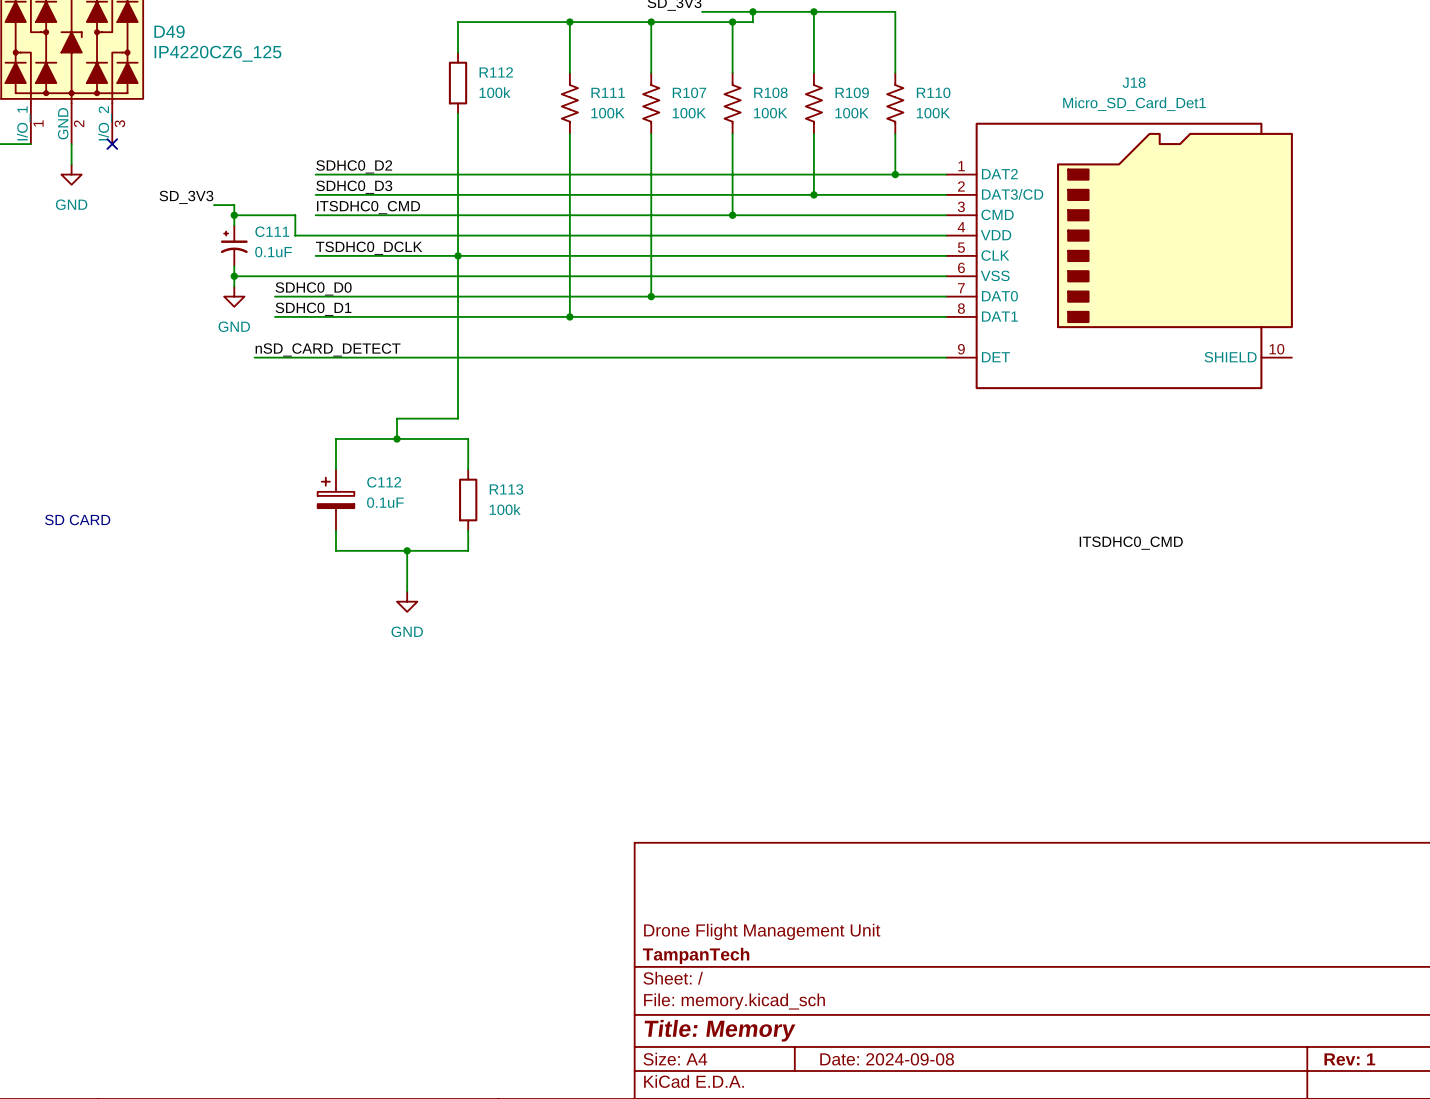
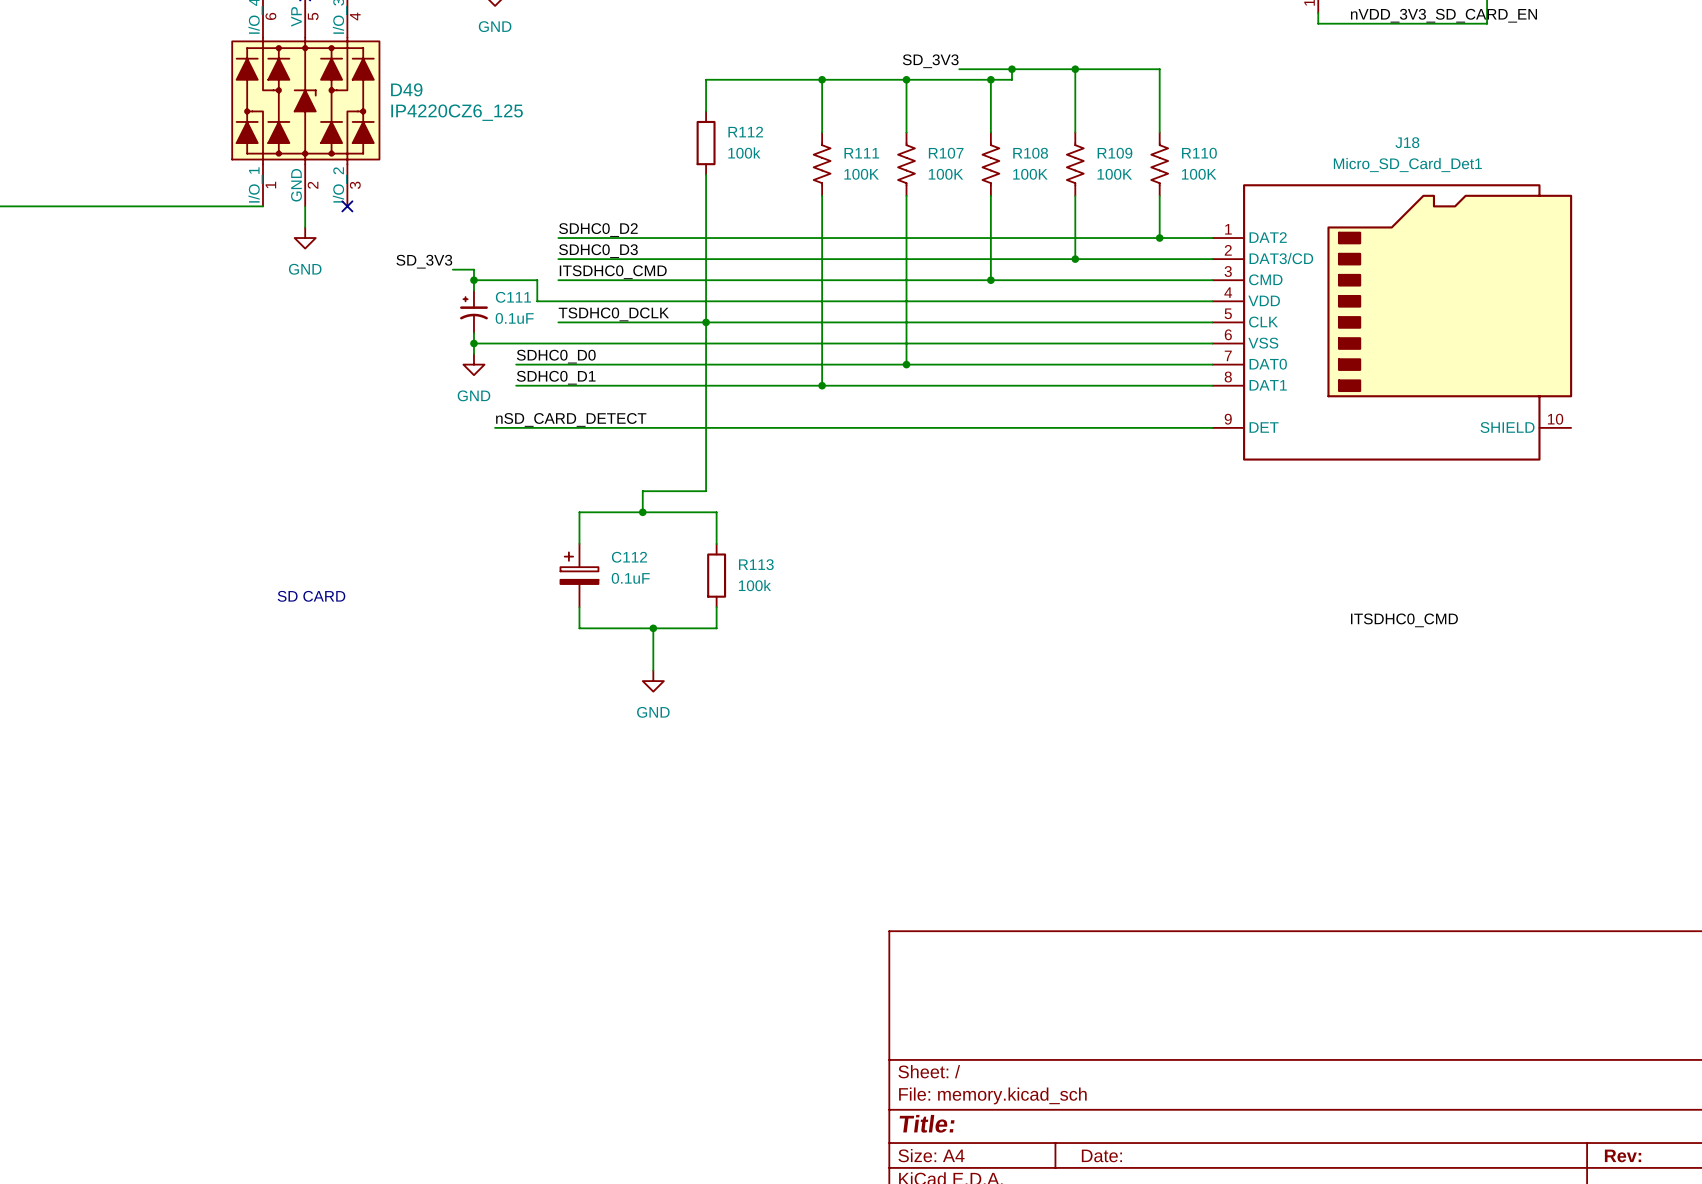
title block: Drone Flight Management Unit (762, 931) -> none
title block: TampanTech (696, 955) -> none
title block: Title: Memory (720, 1030) -> Title: (927, 1123)
title block: Date: 2024-09-08 (887, 1059) -> Date: (1101, 1155)
title block: Rev: 1 (1349, 1059) -> Rev: (1623, 1155)

